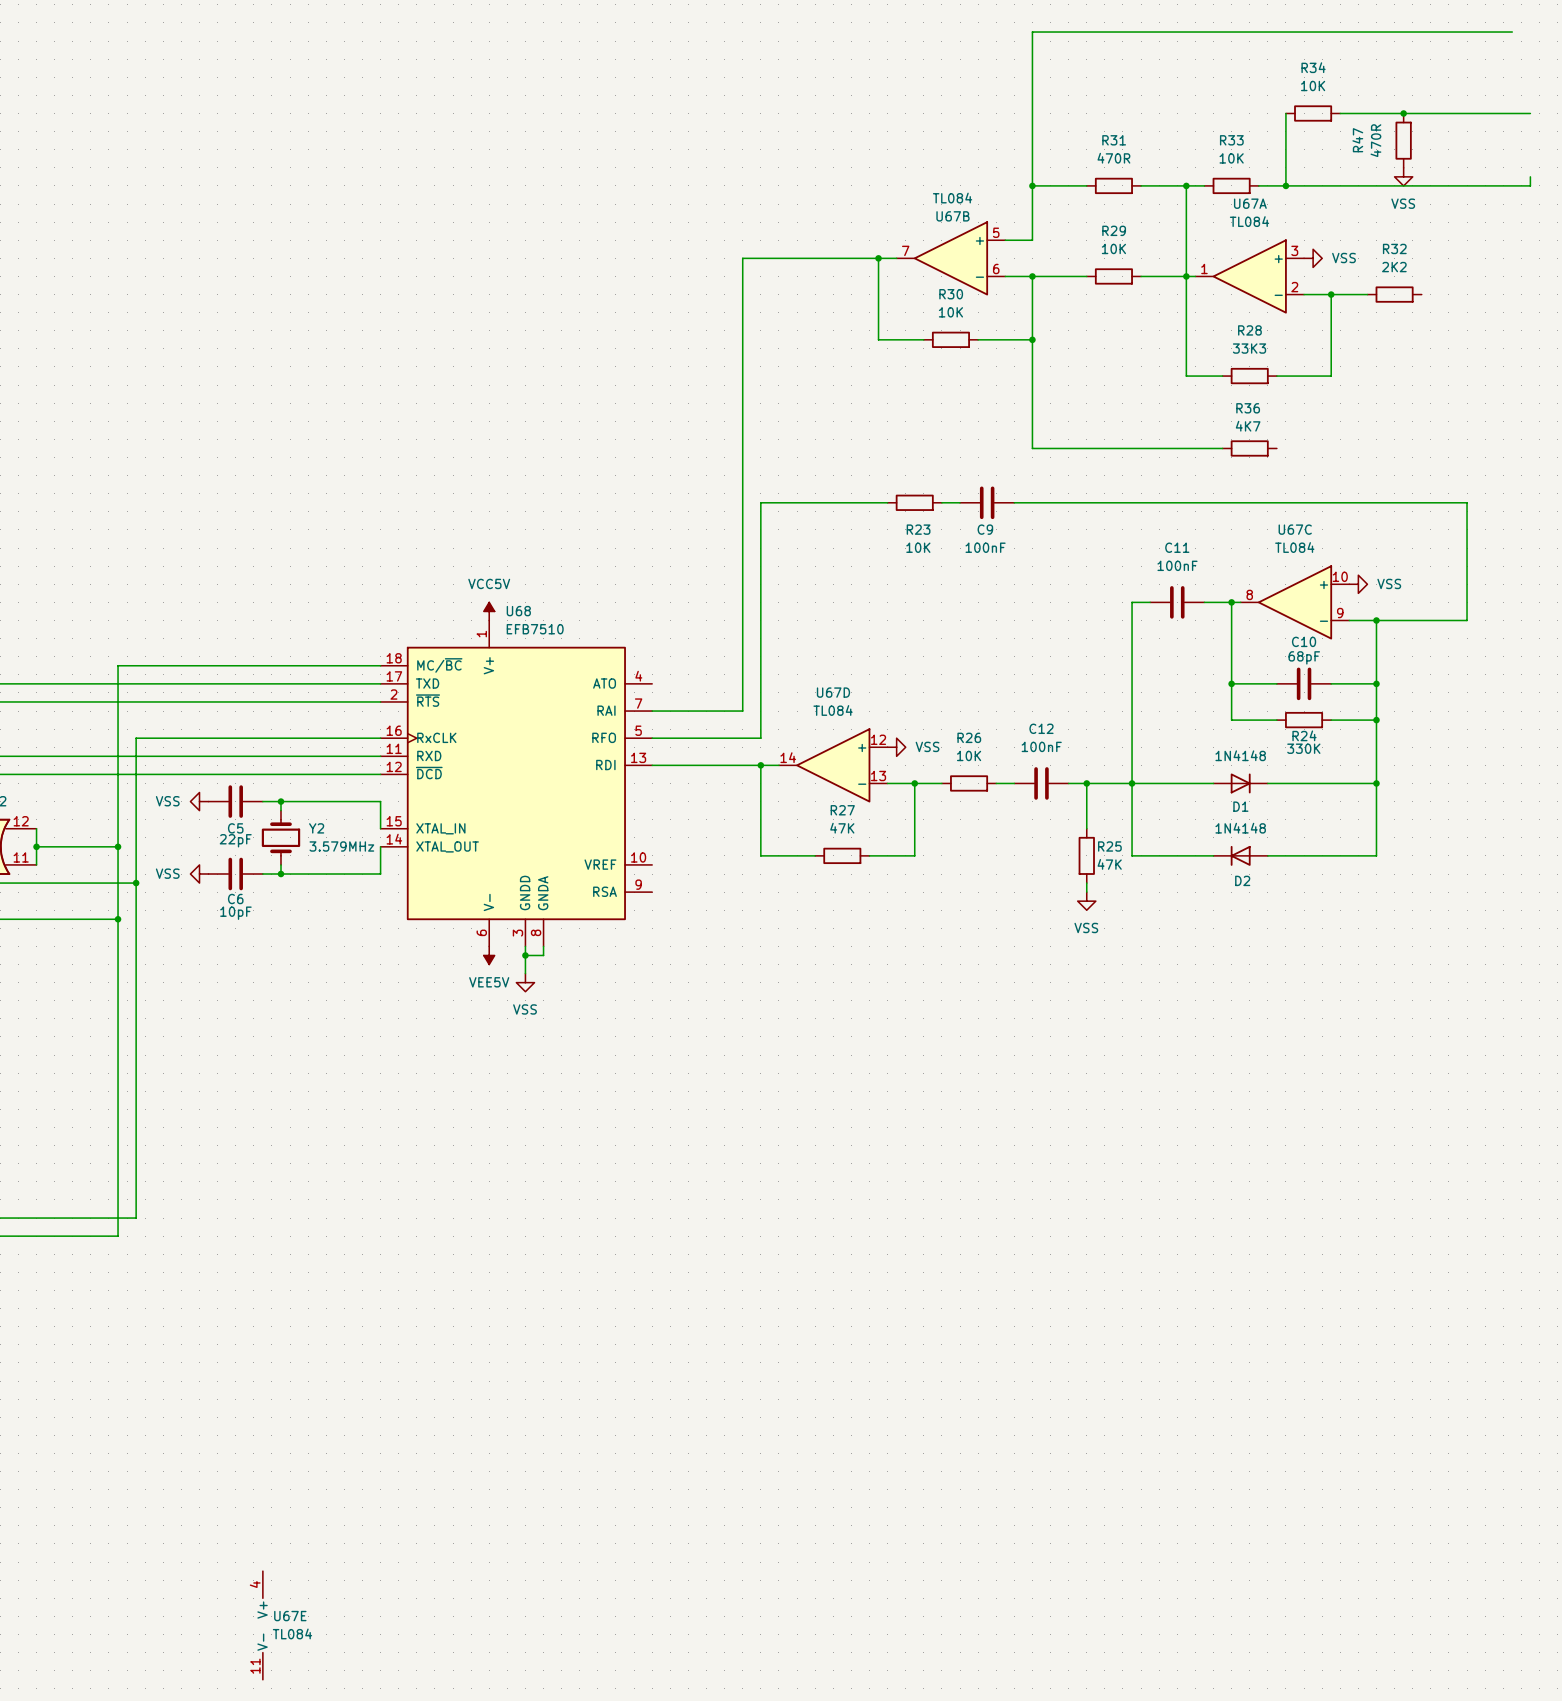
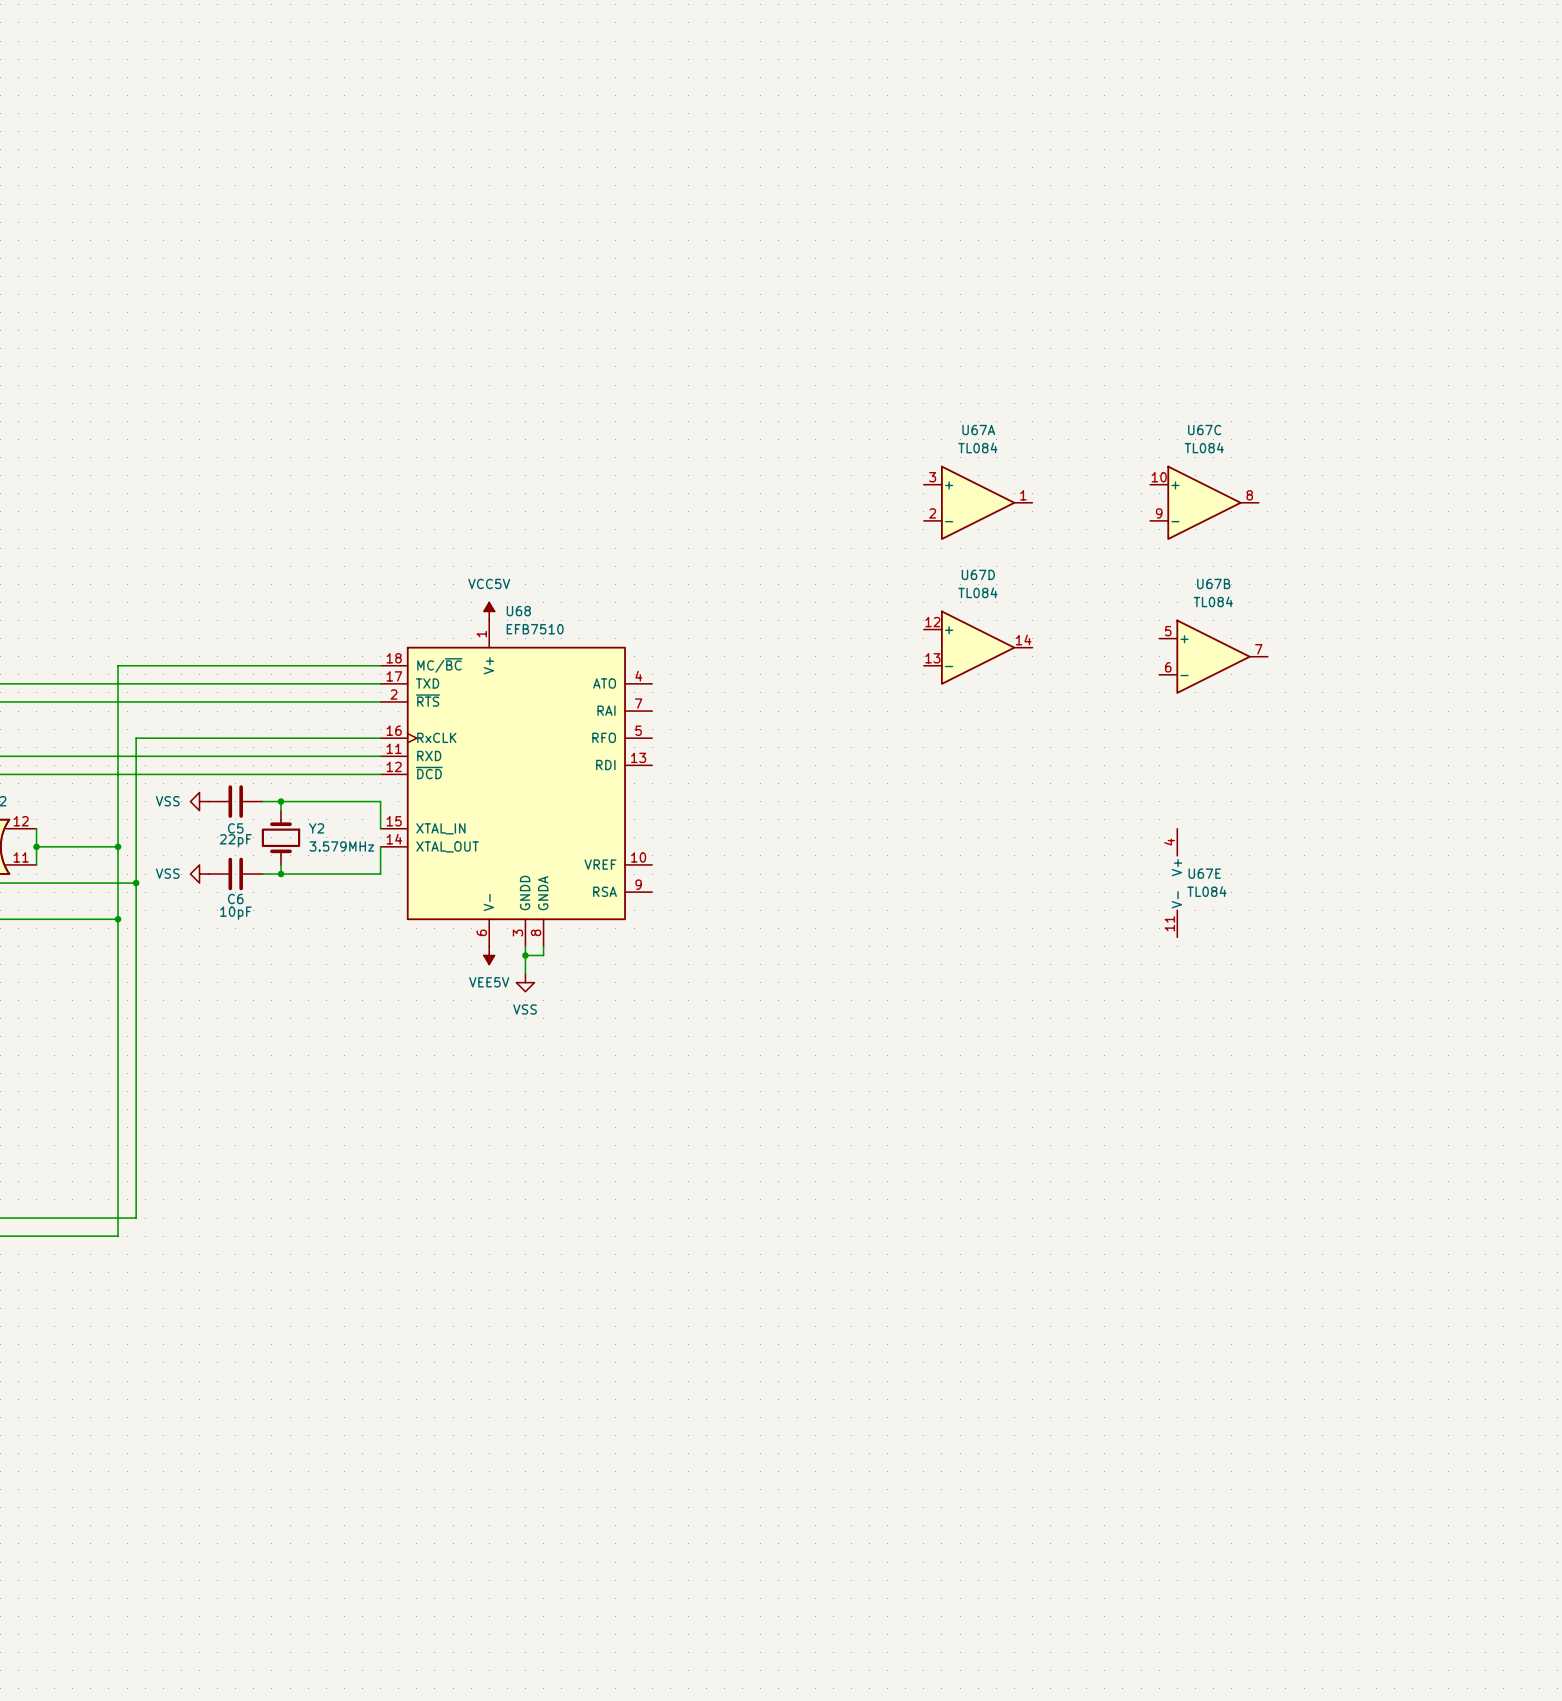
wire: (1512, 32) (1032, 32) (1032, 240) (1005, 240) -> none
wire: (1285, 113) (1285, 185) -> none
R34: 10K (1313, 113) -> none
wire: (1340, 113) (1530, 113) -> none
junction: (1403, 113) -> none
R47: 470R (1403, 140) -> none
power symbol: VSS (1403, 176) -> none
wire: (1530, 176) (1530, 185) (1258, 185) -> none
wire: (1032, 185) (1086, 185) -> none
junction: (1032, 185) -> none
R31: 470R (1113, 185) -> none
wire: (1141, 185) (1204, 185) -> none
wire: (1186, 185) (1186, 376) (1222, 376) -> none
junction: (1186, 185) -> none
R33: 10K (1231, 185) -> none
junction: (1285, 185) -> none
U67B name position: U67B (952, 216) -> U67B (1213, 583)
wire: (878, 258) (878, 339) (923, 339) -> none
junction: (878, 258) -> none
wire: (896, 258) (742, 258) (742, 711) (652, 711) -> none
U67B flip: as is (950, 258) -> left-right (1213, 656)
U67B position: (950, 258) -> (1213, 656)
power symbol: VSS (1313, 258) -> none
wire: (1005, 276) (1086, 276) -> none
wire: (1032, 276) (1032, 448) (1222, 448) -> none
junction: (1032, 276) -> none
R29: 10K (1113, 276) -> none
wire: (1141, 276) (1195, 276) -> none
junction: (1186, 276) -> none
U67A flip: as is (1249, 276) -> left-right (978, 502)
U67A position: (1249, 276) -> (978, 502)
wire: (1304, 294) (1367, 294) -> none
wire: (1331, 294) (1331, 376) (1276, 376) -> none
junction: (1331, 294) -> none
R32: 2K2 (1394, 294) -> none
R30: 10K (950, 339) -> none
wire: (978, 339) (1032, 339) -> none
junction: (1032, 339) -> none
R28: 33K3 (1249, 376) -> none
R36: 4K7 (1249, 448) -> none
wire: (887, 502) (760, 502) (760, 738) (652, 738) -> none
R23: 10K (914, 502) -> none
C9: 100nF (987, 502) -> none
wire: (1014, 502) (1467, 502) (1467, 620) (1349, 620) -> none
power symbol: VSS (1358, 584) -> none
wire: (1150, 602) (1132, 602) (1132, 855) (1213, 855) -> none
C11: 100nF (1177, 602) -> none
wire: (1204, 602) (1240, 602) -> none
wire: (1231, 602) (1231, 720) (1276, 720) -> none
junction: (1231, 602) -> none
U67C flip: as is (1294, 602) -> left-right (1204, 502)
U67C position: (1294, 602) -> (1204, 502)
wire: (1376, 620) (1376, 855) (1267, 855) -> none
junction: (1376, 620) -> none
wire: (1231, 683) (1276, 683) -> none
junction: (1231, 683) -> none
C10: 68pF (1304, 683) -> none
wire: (1331, 683) (1376, 683) -> none
junction: (1376, 683) -> none
R24: 330K (1304, 720) -> none
wire: (1331, 720) (1376, 720) -> none
junction: (1376, 720) -> none
power symbol: VSS (896, 747) -> none
wire: (652, 765) (778, 765) -> none
wire: (760, 765) (760, 855) (815, 855) -> none
junction: (760, 765) -> none
U67D flip: as is (833, 765) -> left-right (978, 647)
U67D position: (833, 765) -> (978, 647)
wire: (887, 783) (941, 783) -> none
wire: (914, 783) (914, 855) (869, 855) -> none
junction: (914, 783) -> none
R26: 10K (969, 783) -> none
wire: (996, 783) (1014, 783) -> none
C12: 100nF (1041, 783) -> none
wire: (1068, 783) (1213, 783) -> none
wire: (1086, 783) (1086, 828) -> none
junction: (1086, 783) -> none
junction: (1132, 783) -> none
D1: 1N4148 (1240, 783) -> none
wire: (1267, 783) (1376, 783) -> none
junction: (1376, 783) -> none
R27: 47K (842, 855) -> none
R25: 47K (1086, 855) -> none
D2: 1N4148 (1240, 855) -> none
wire: (1086, 883) (1086, 892) -> none
power symbol: VSS (1086, 901) -> none
U67E position: (262, 1625) -> (1177, 883)

